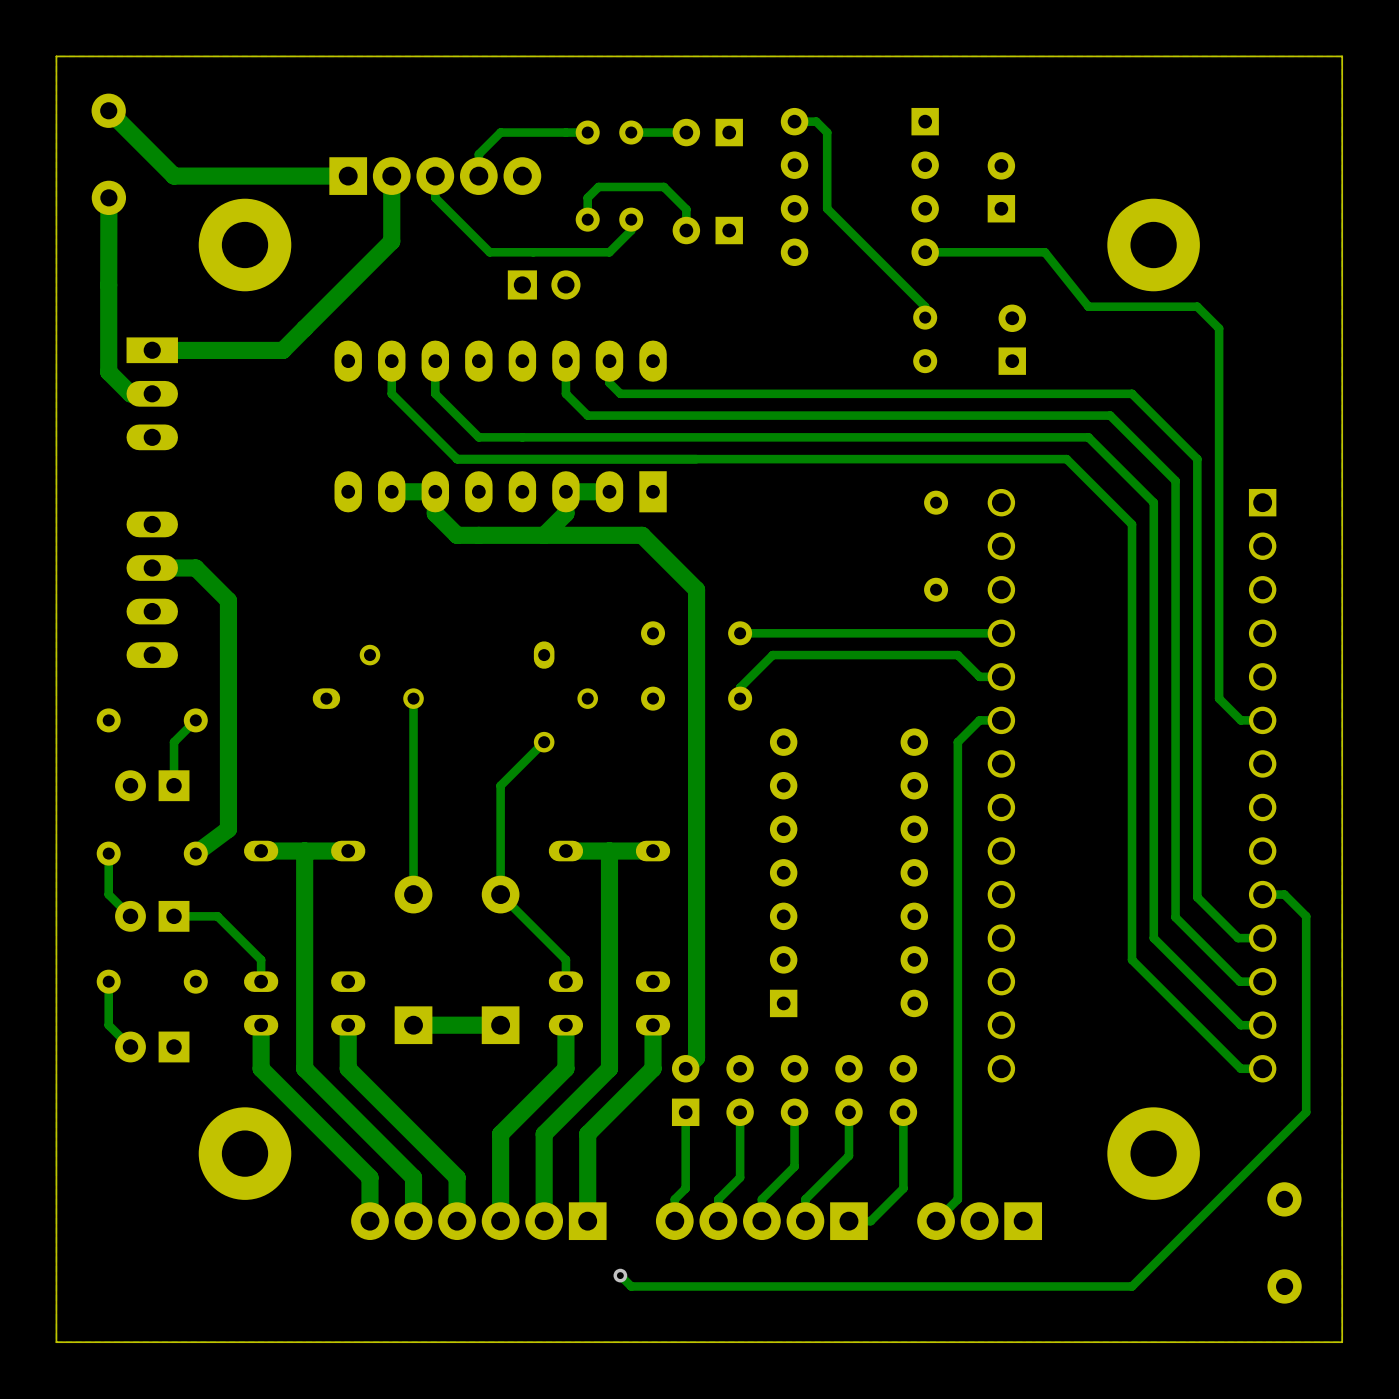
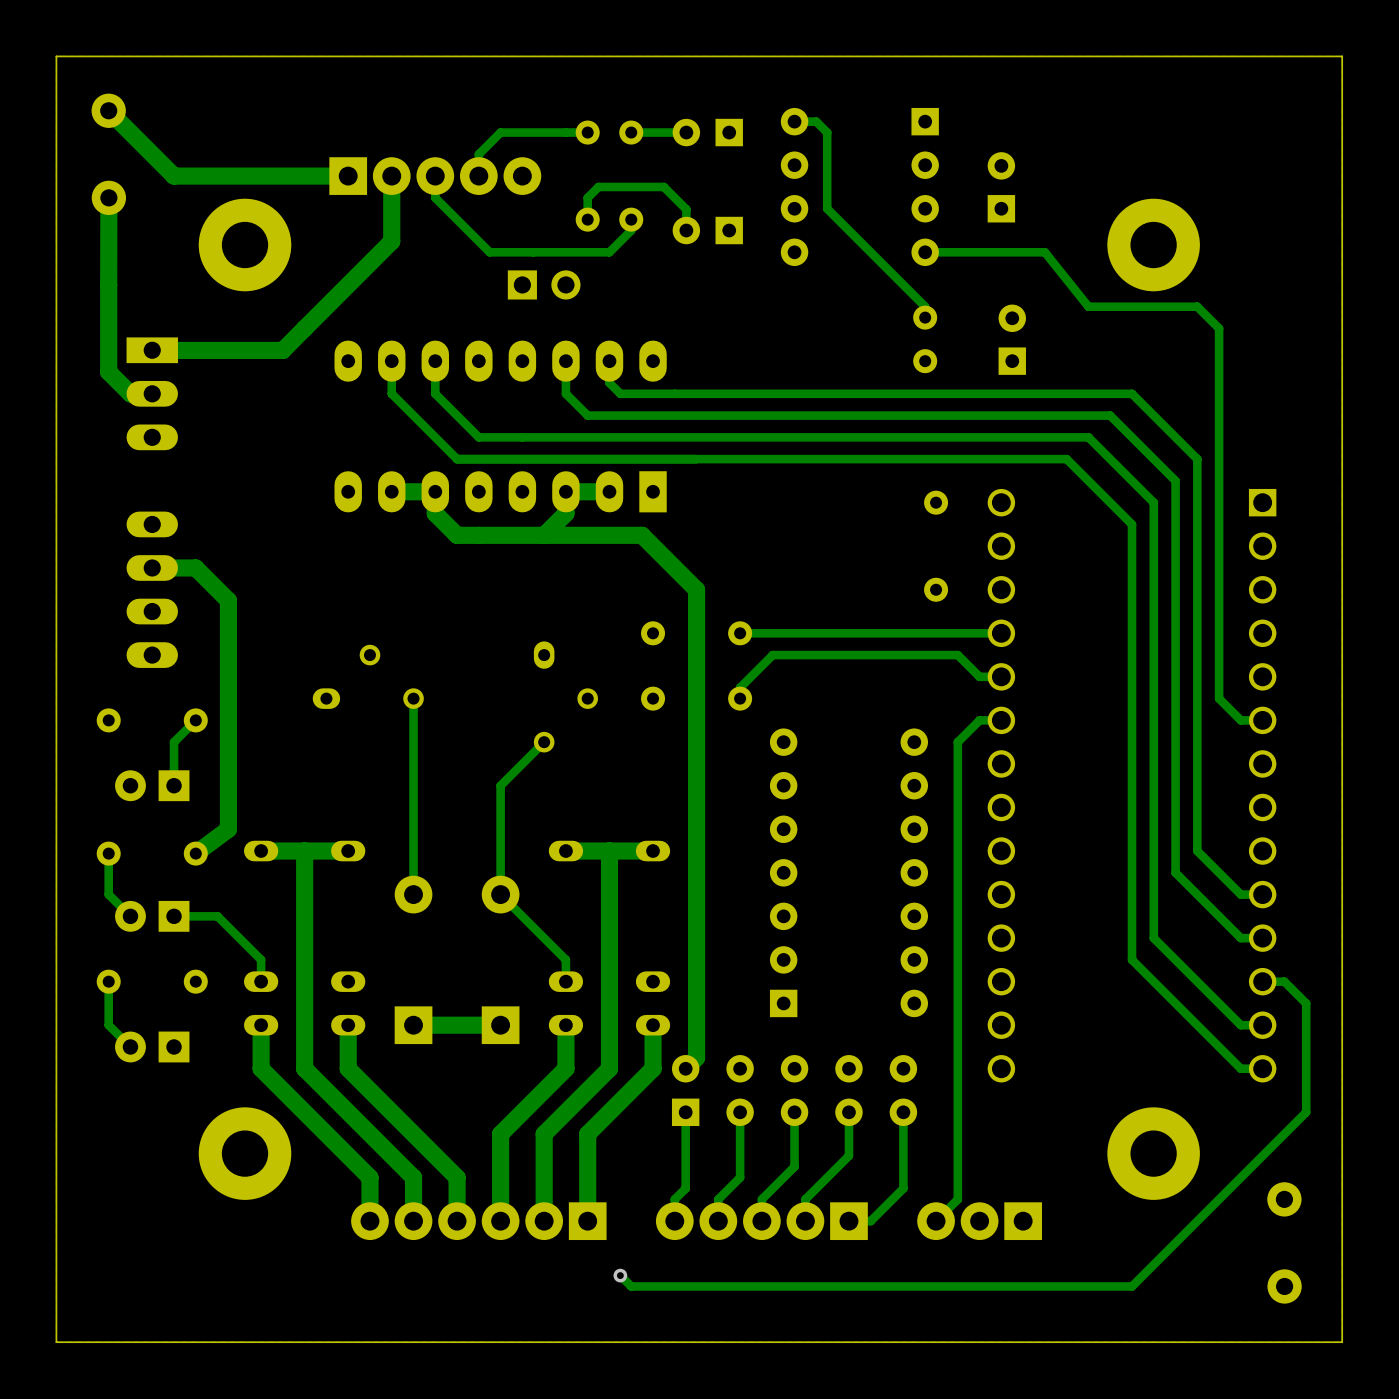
track: (1197, 851) (1197, 897) (1238, 938) (1240, 938) -> (1175, 872) (1240, 938)
track: none -> (1197, 851) (1240, 894) (1262, 894)
track: (1175, 872) (1175, 917) (1239, 981) (1262, 981) -> none
track: (1262, 894) (1284, 894) (1306, 916) (1306, 1003) -> (1262, 981) (1284, 981) (1306, 1003)

